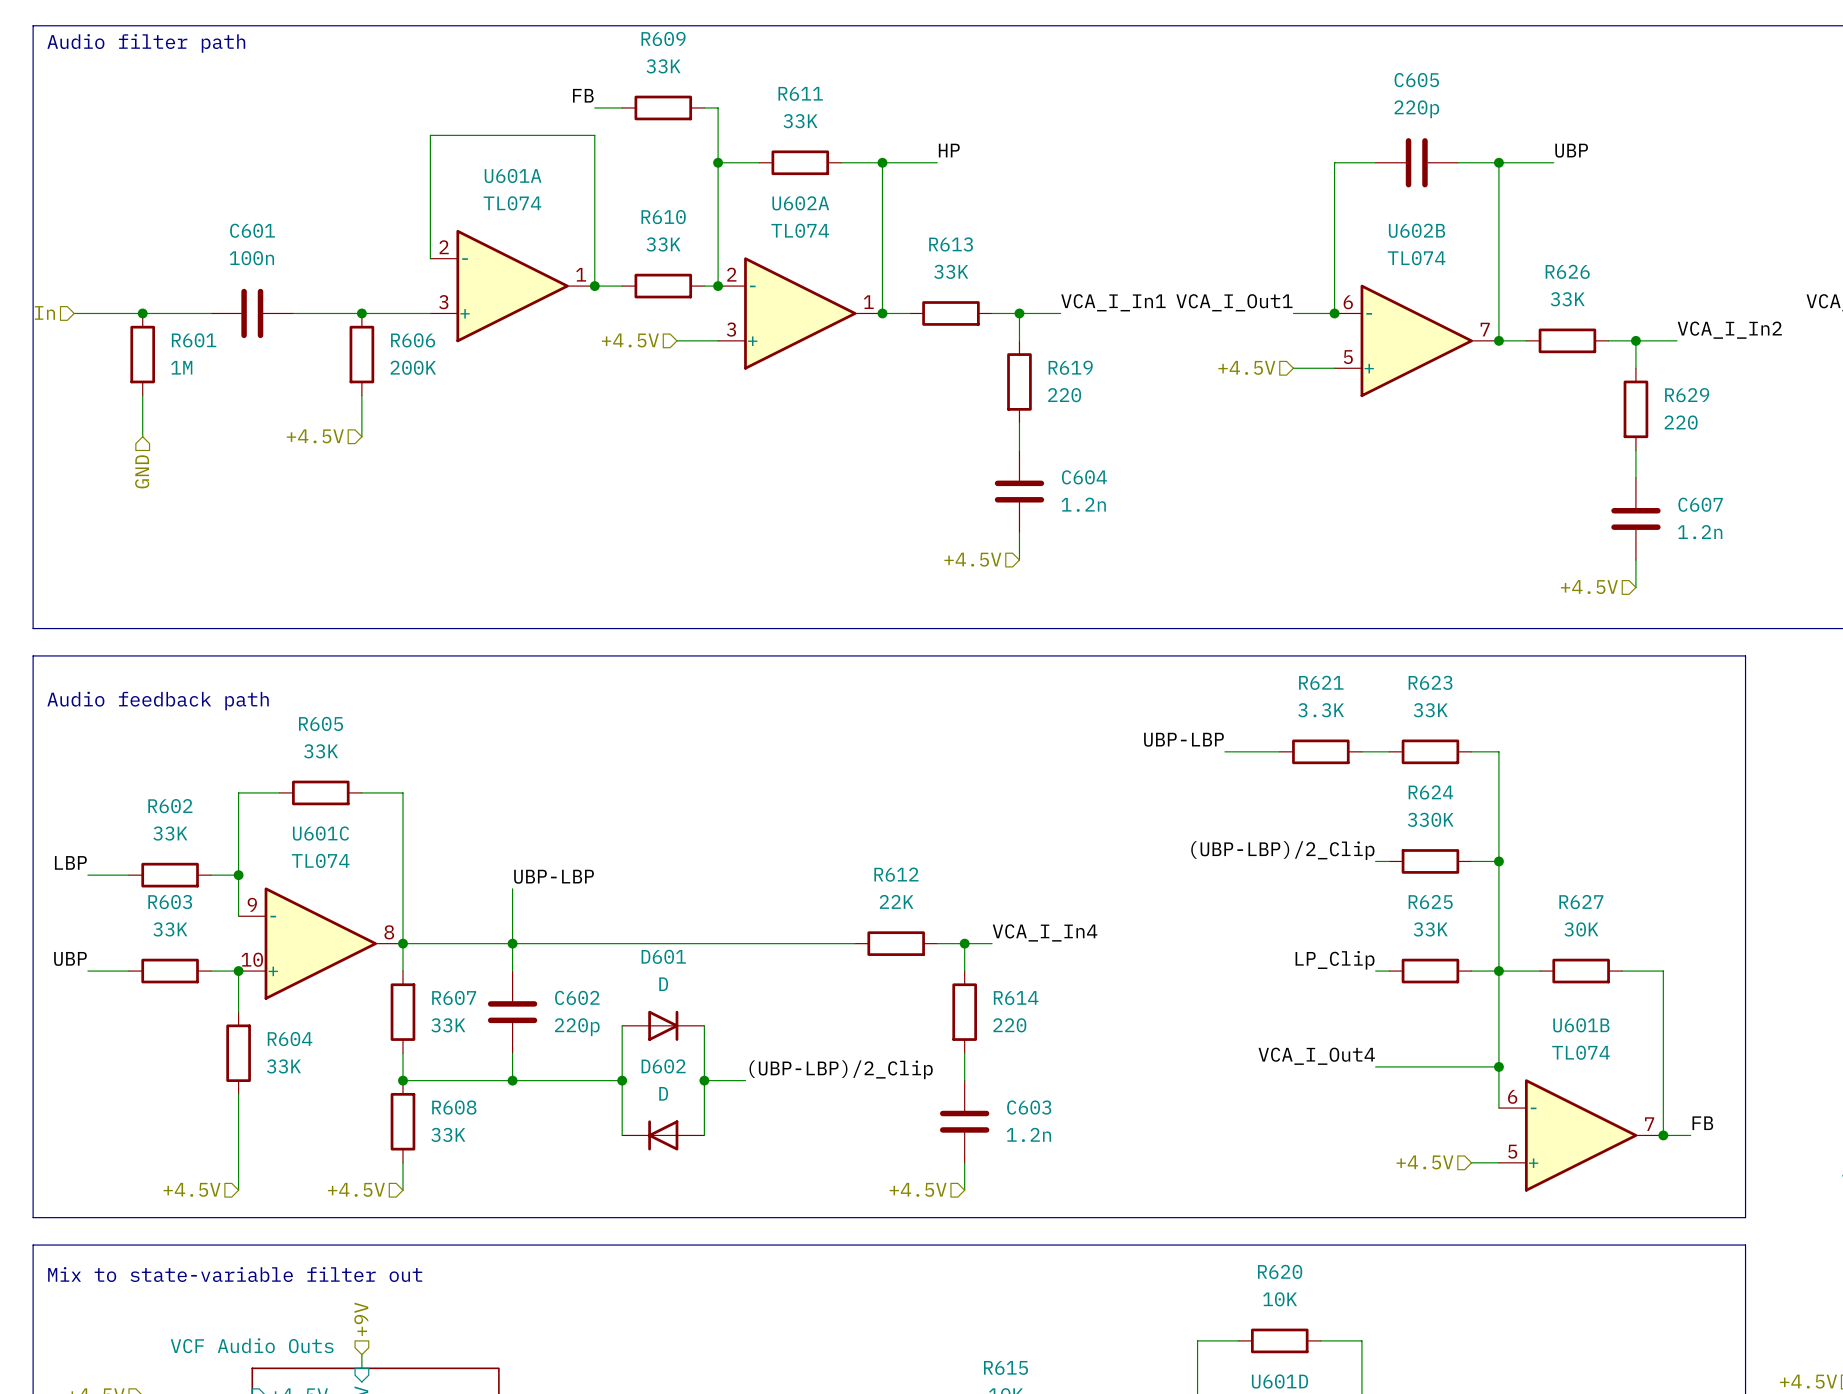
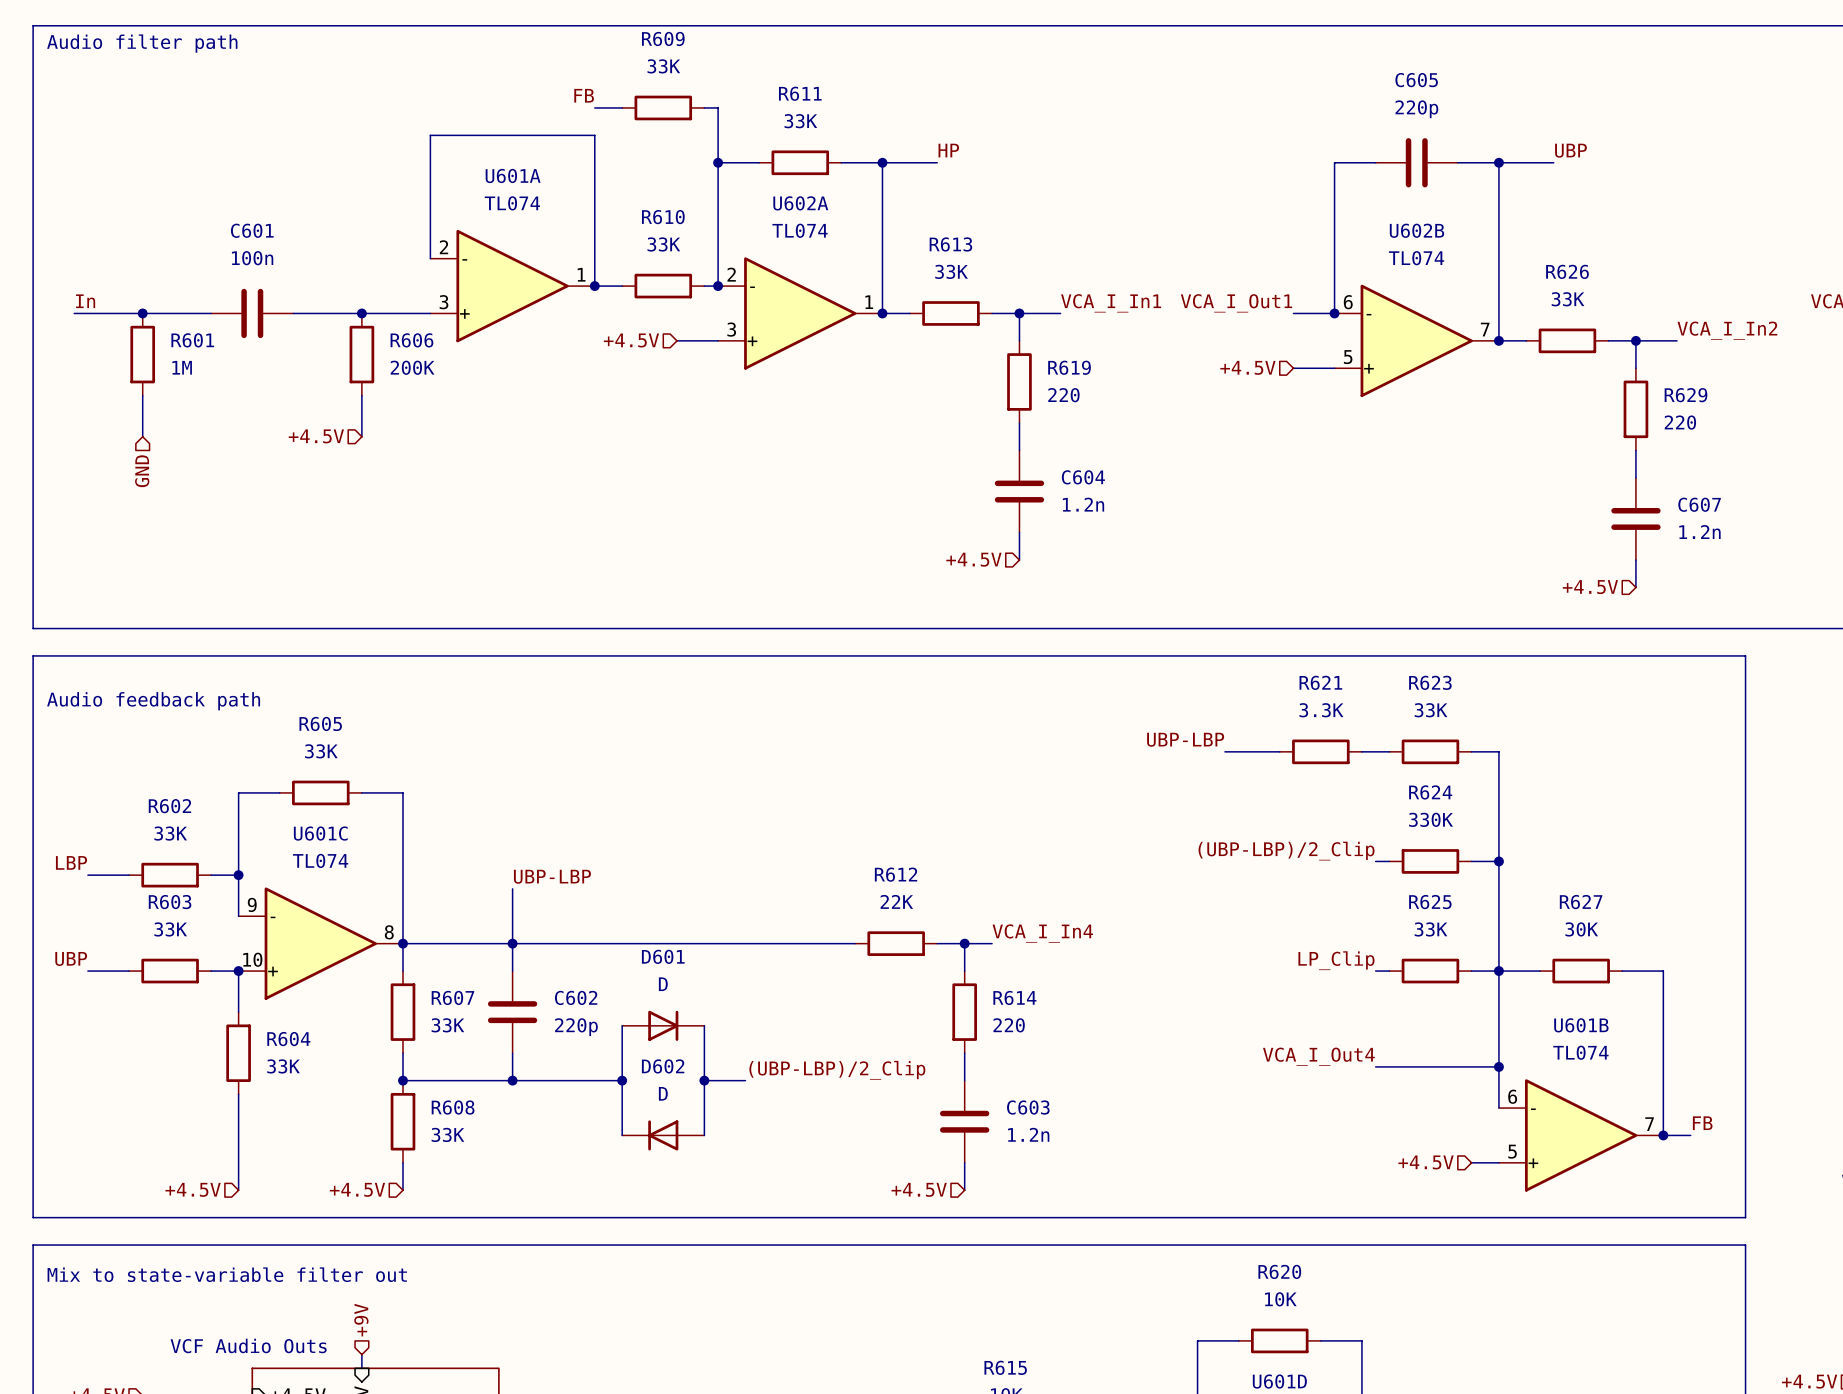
label: none -> In (85, 301)
hierarchical label: In (44, 312) -> none

